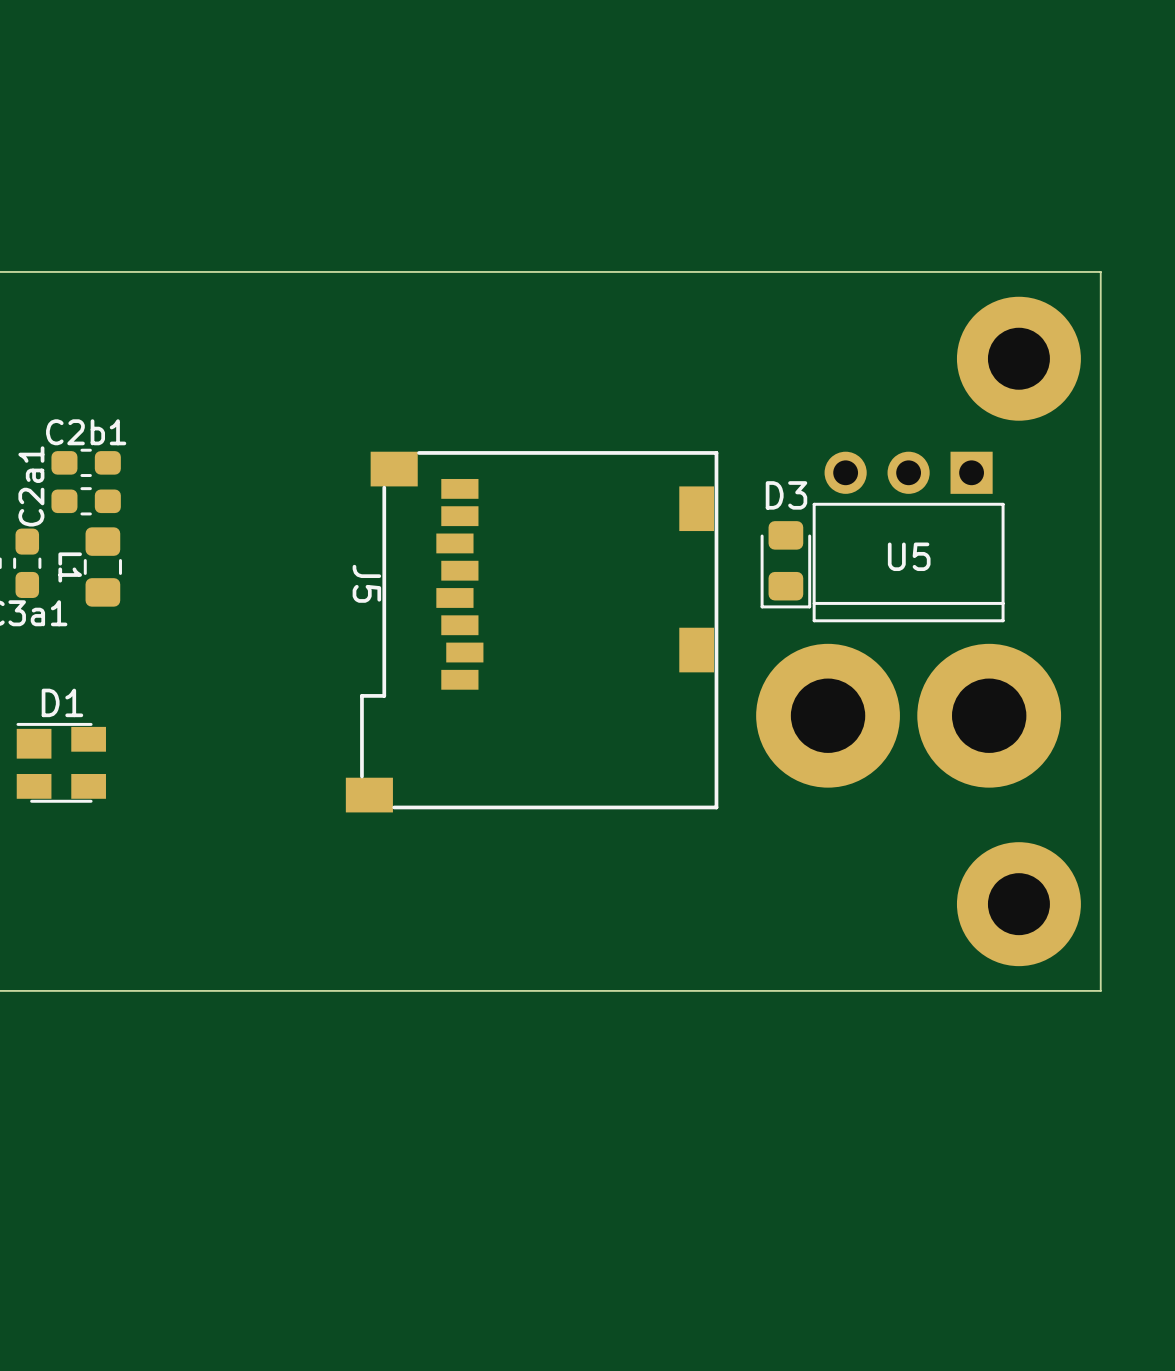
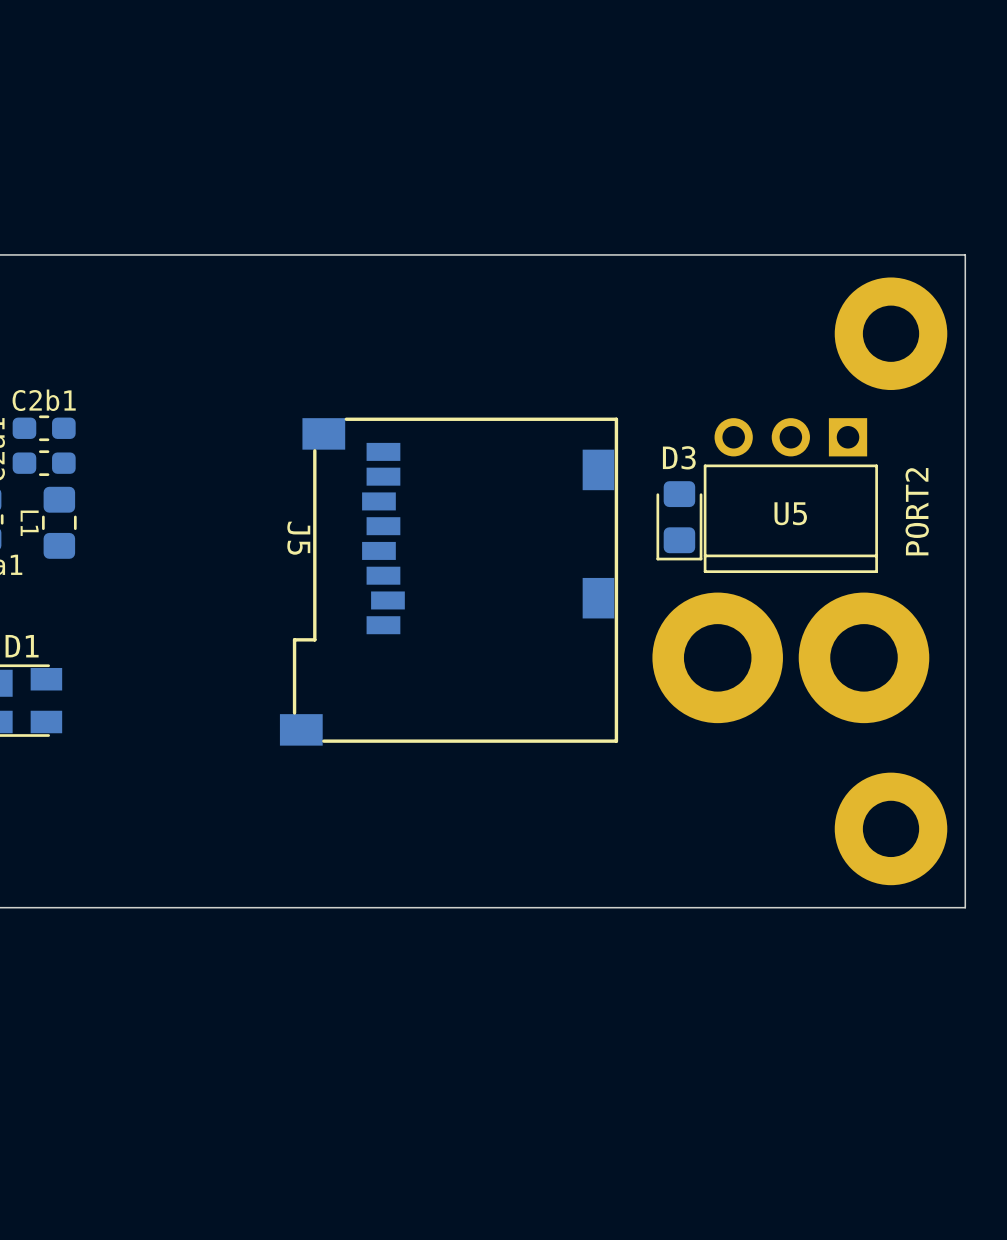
text: none -> PORT2 (917, 511)

